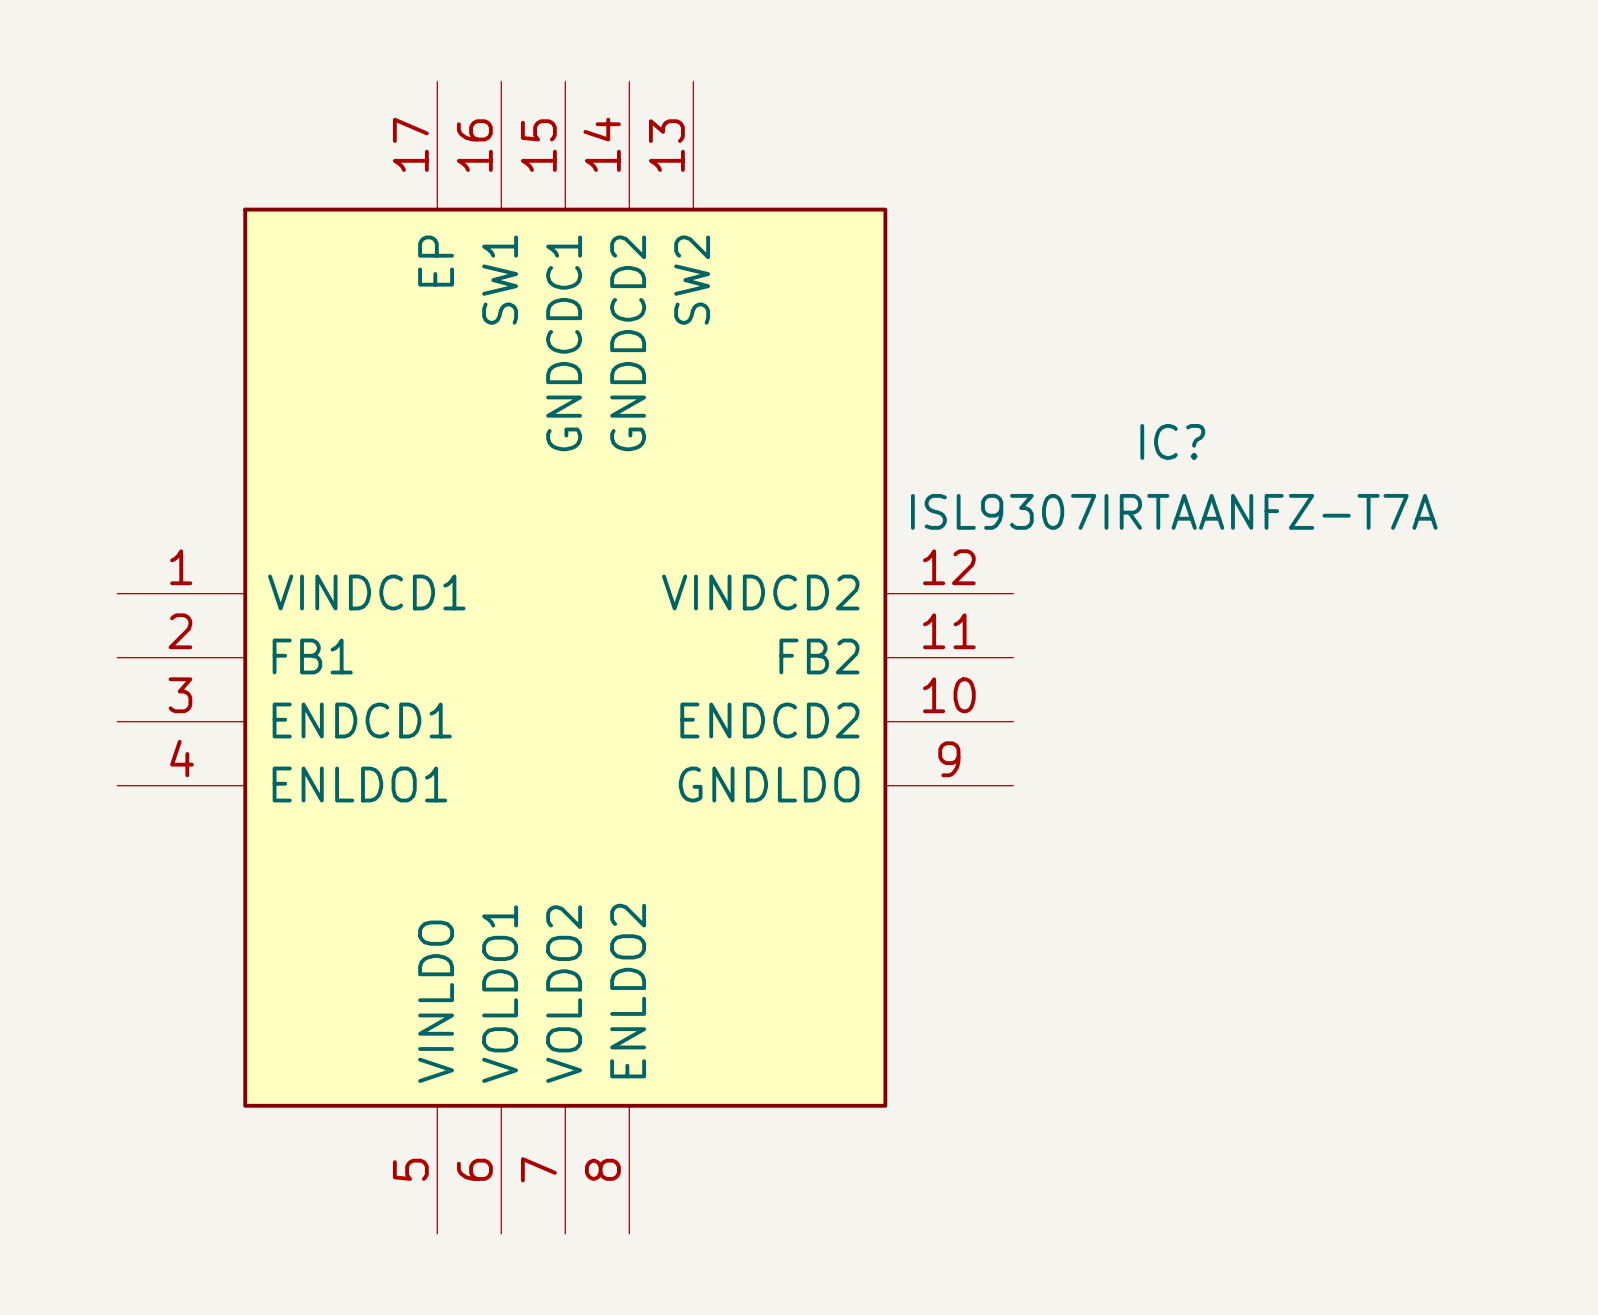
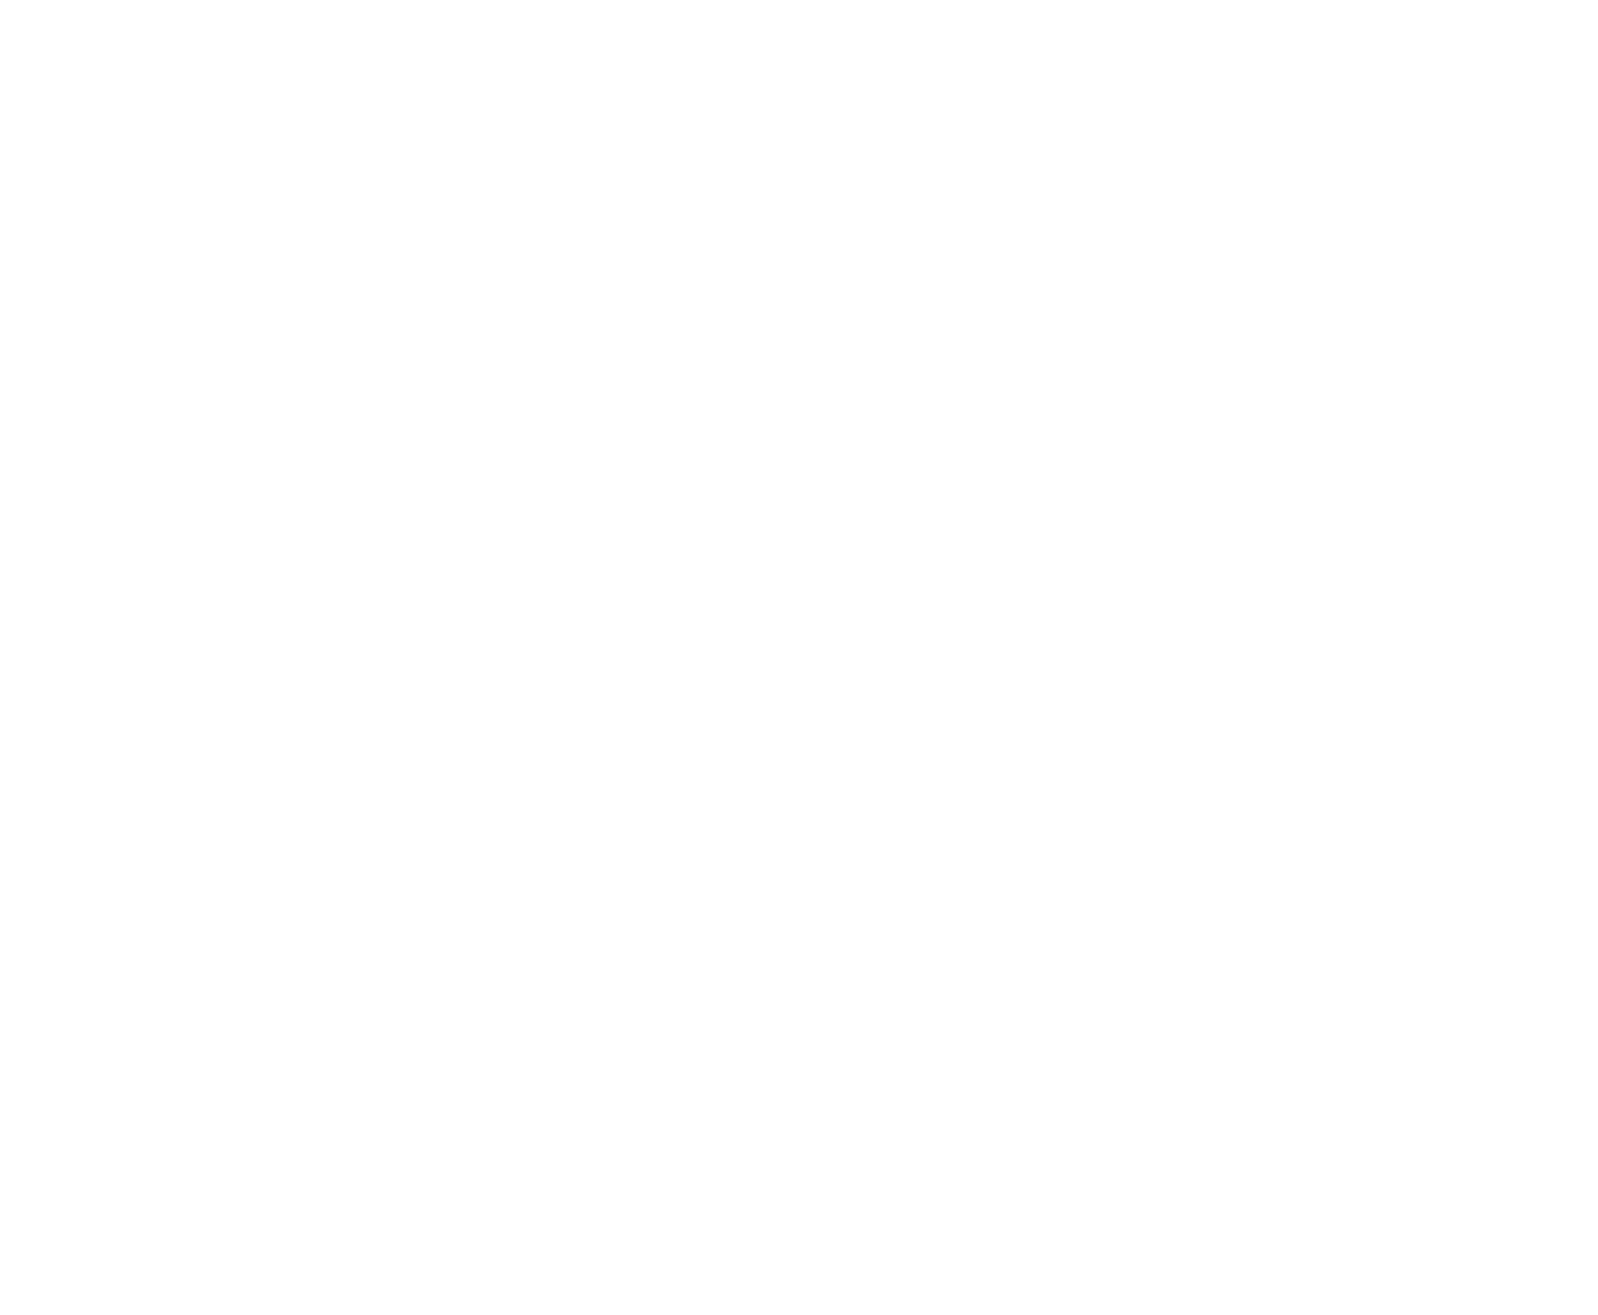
IC?: ISL9307IRTAANFZ-T7A (565, 657) -> none

